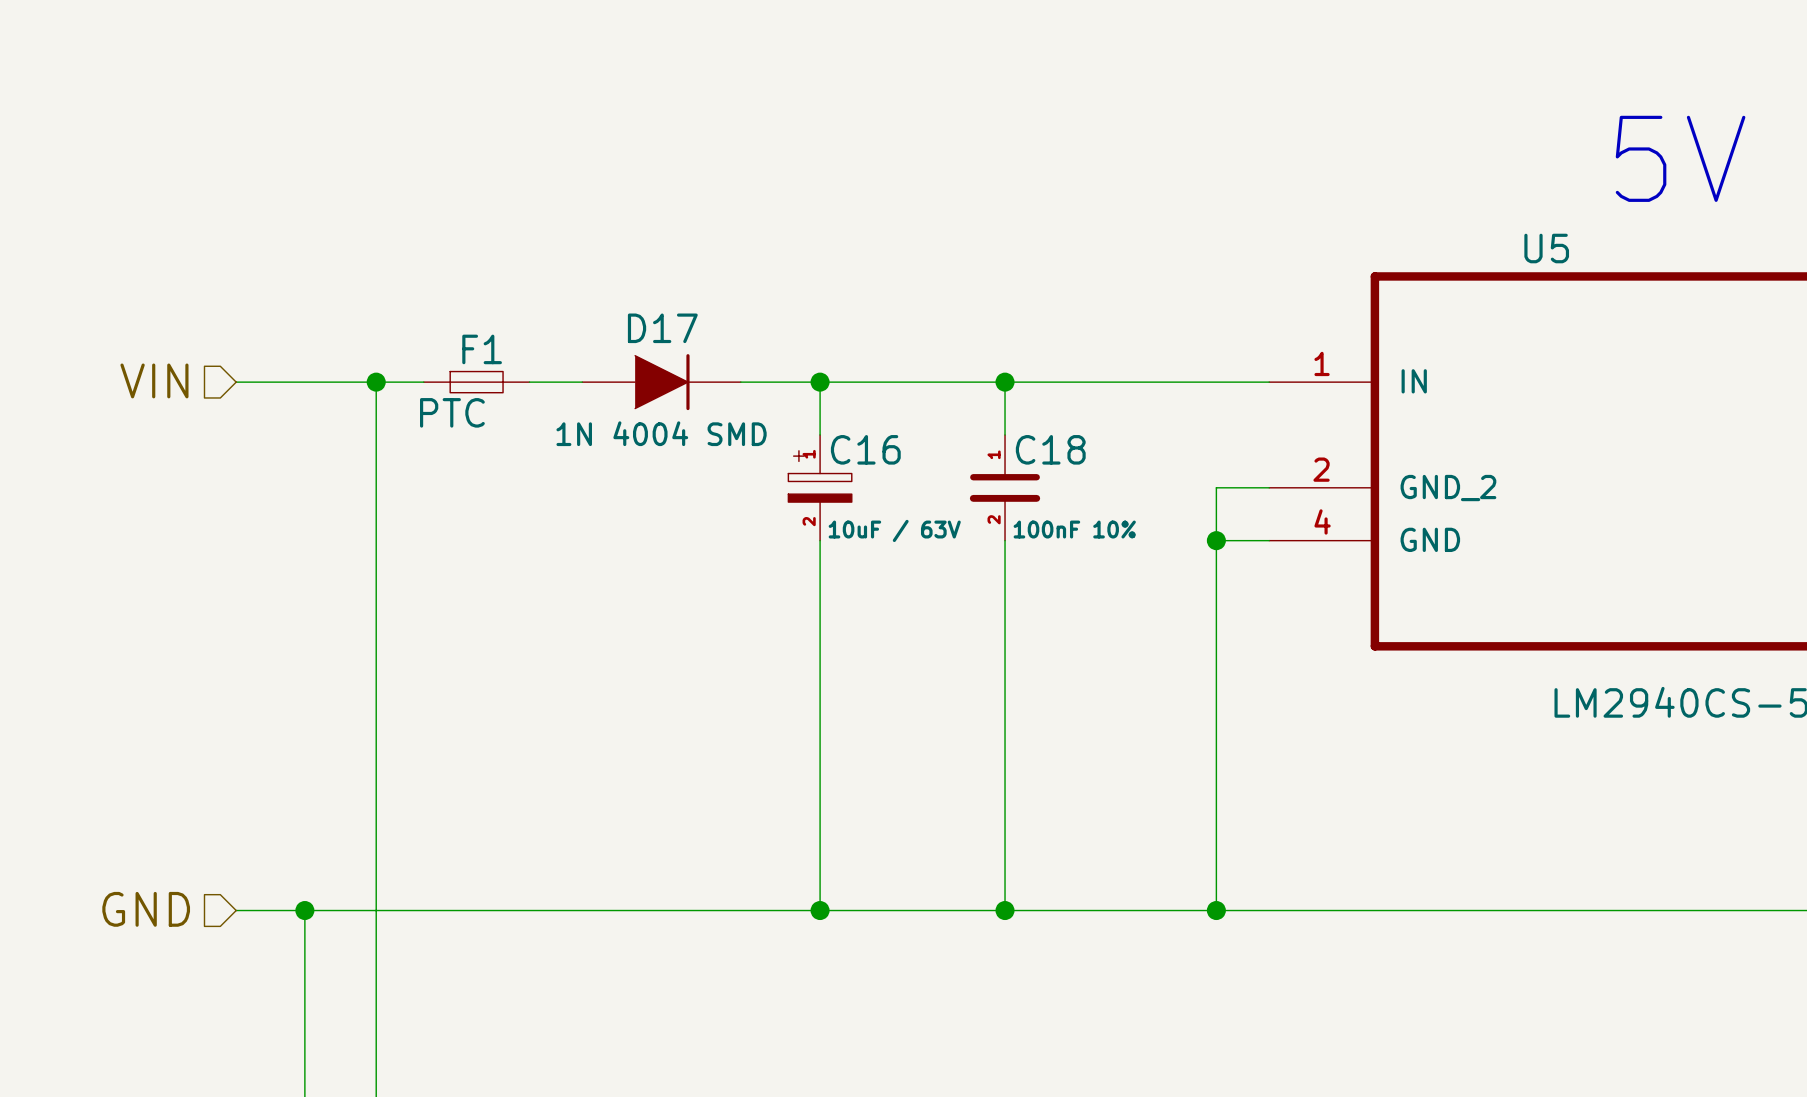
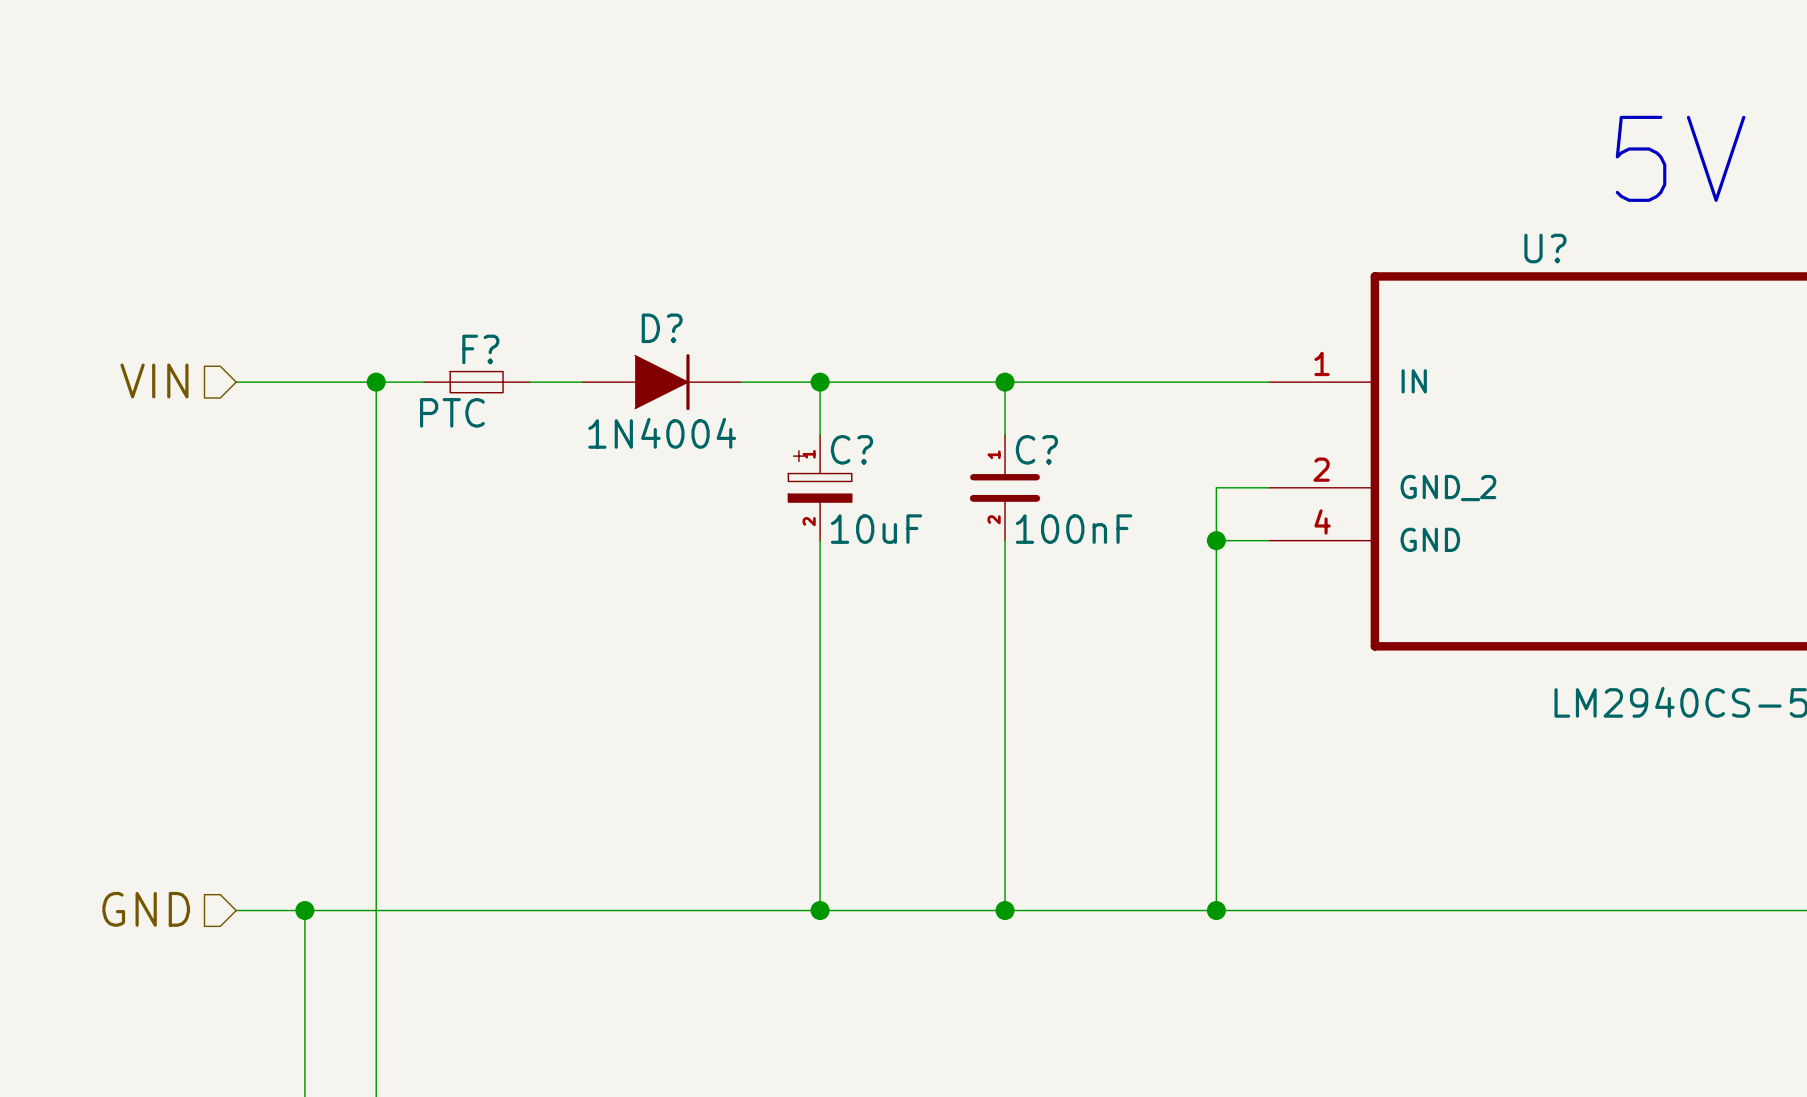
U5 name: U5 (1546, 248) -> U? (1545, 248)
D17 name: D17 (662, 328) -> D? (662, 328)
F1 name: F1 (482, 349) -> F? (480, 349)
D17 value: 1N 4004 SMD (661, 433) -> 1N4004 (662, 433)
C16 name: C16 (865, 449) -> C? (851, 449)
C18 name: C18 (1050, 449) -> C? (1036, 449)
C18 value: 100nF 10% (1074, 529) -> 100nF (1074, 529)
C16 value: 10uF / 63V (894, 530) -> 10uF (876, 529)

